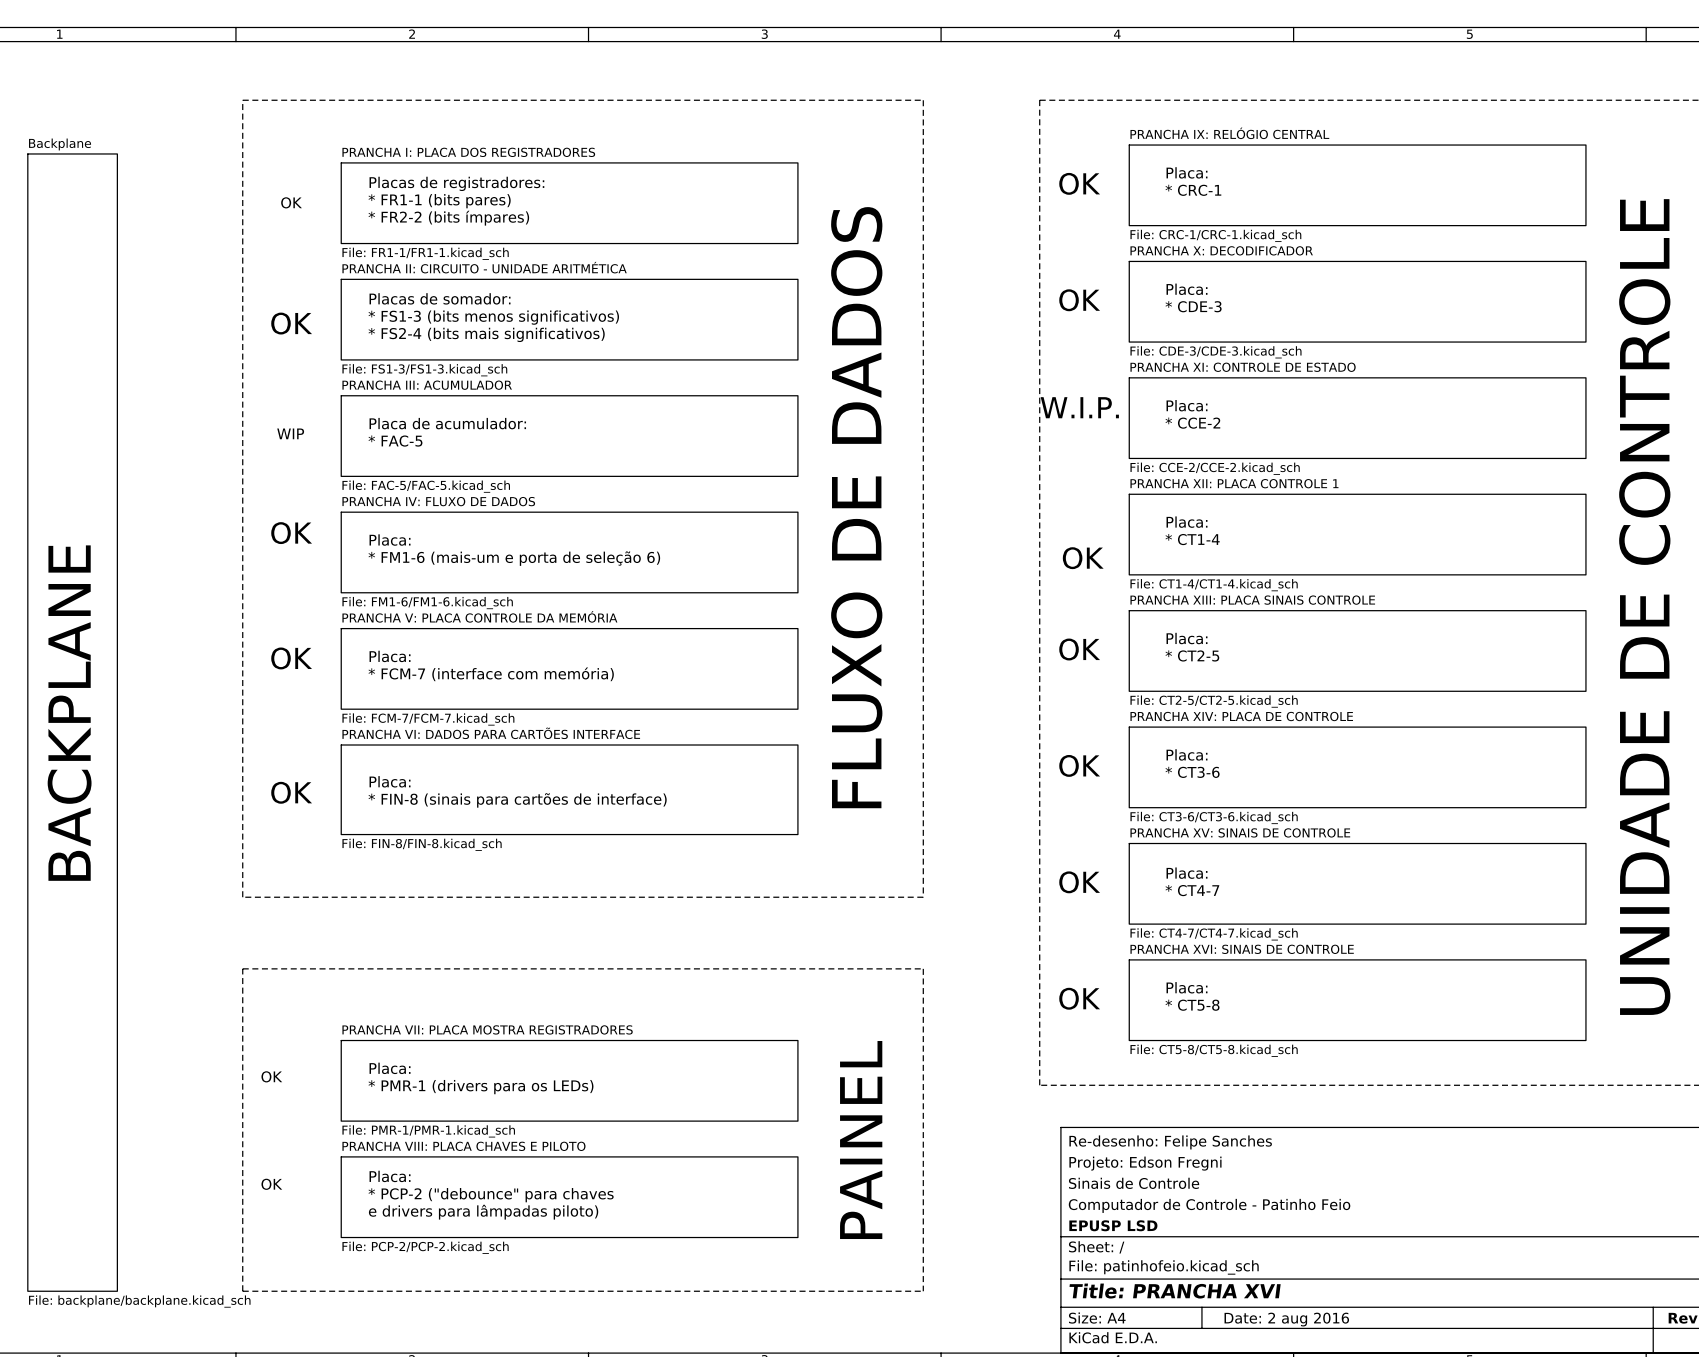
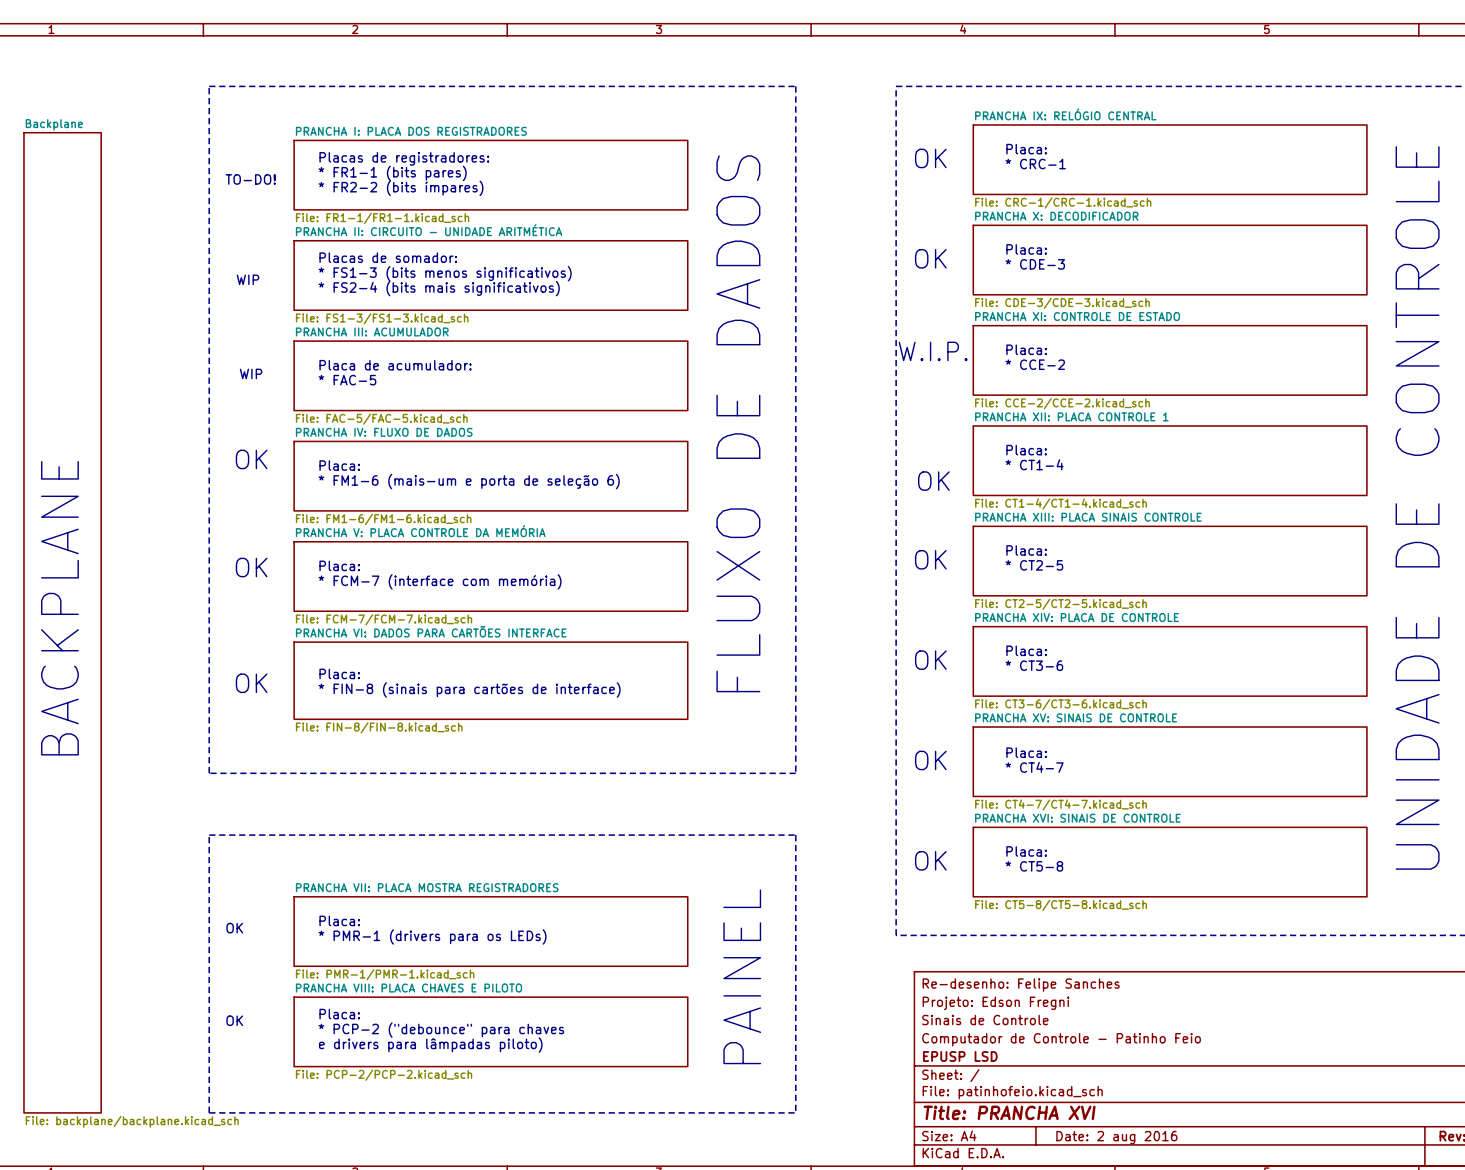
text: OK (291, 202) -> none
text: none -> TO-DO! (250, 179)
text: OK (291, 323) -> WIP (247, 279)

